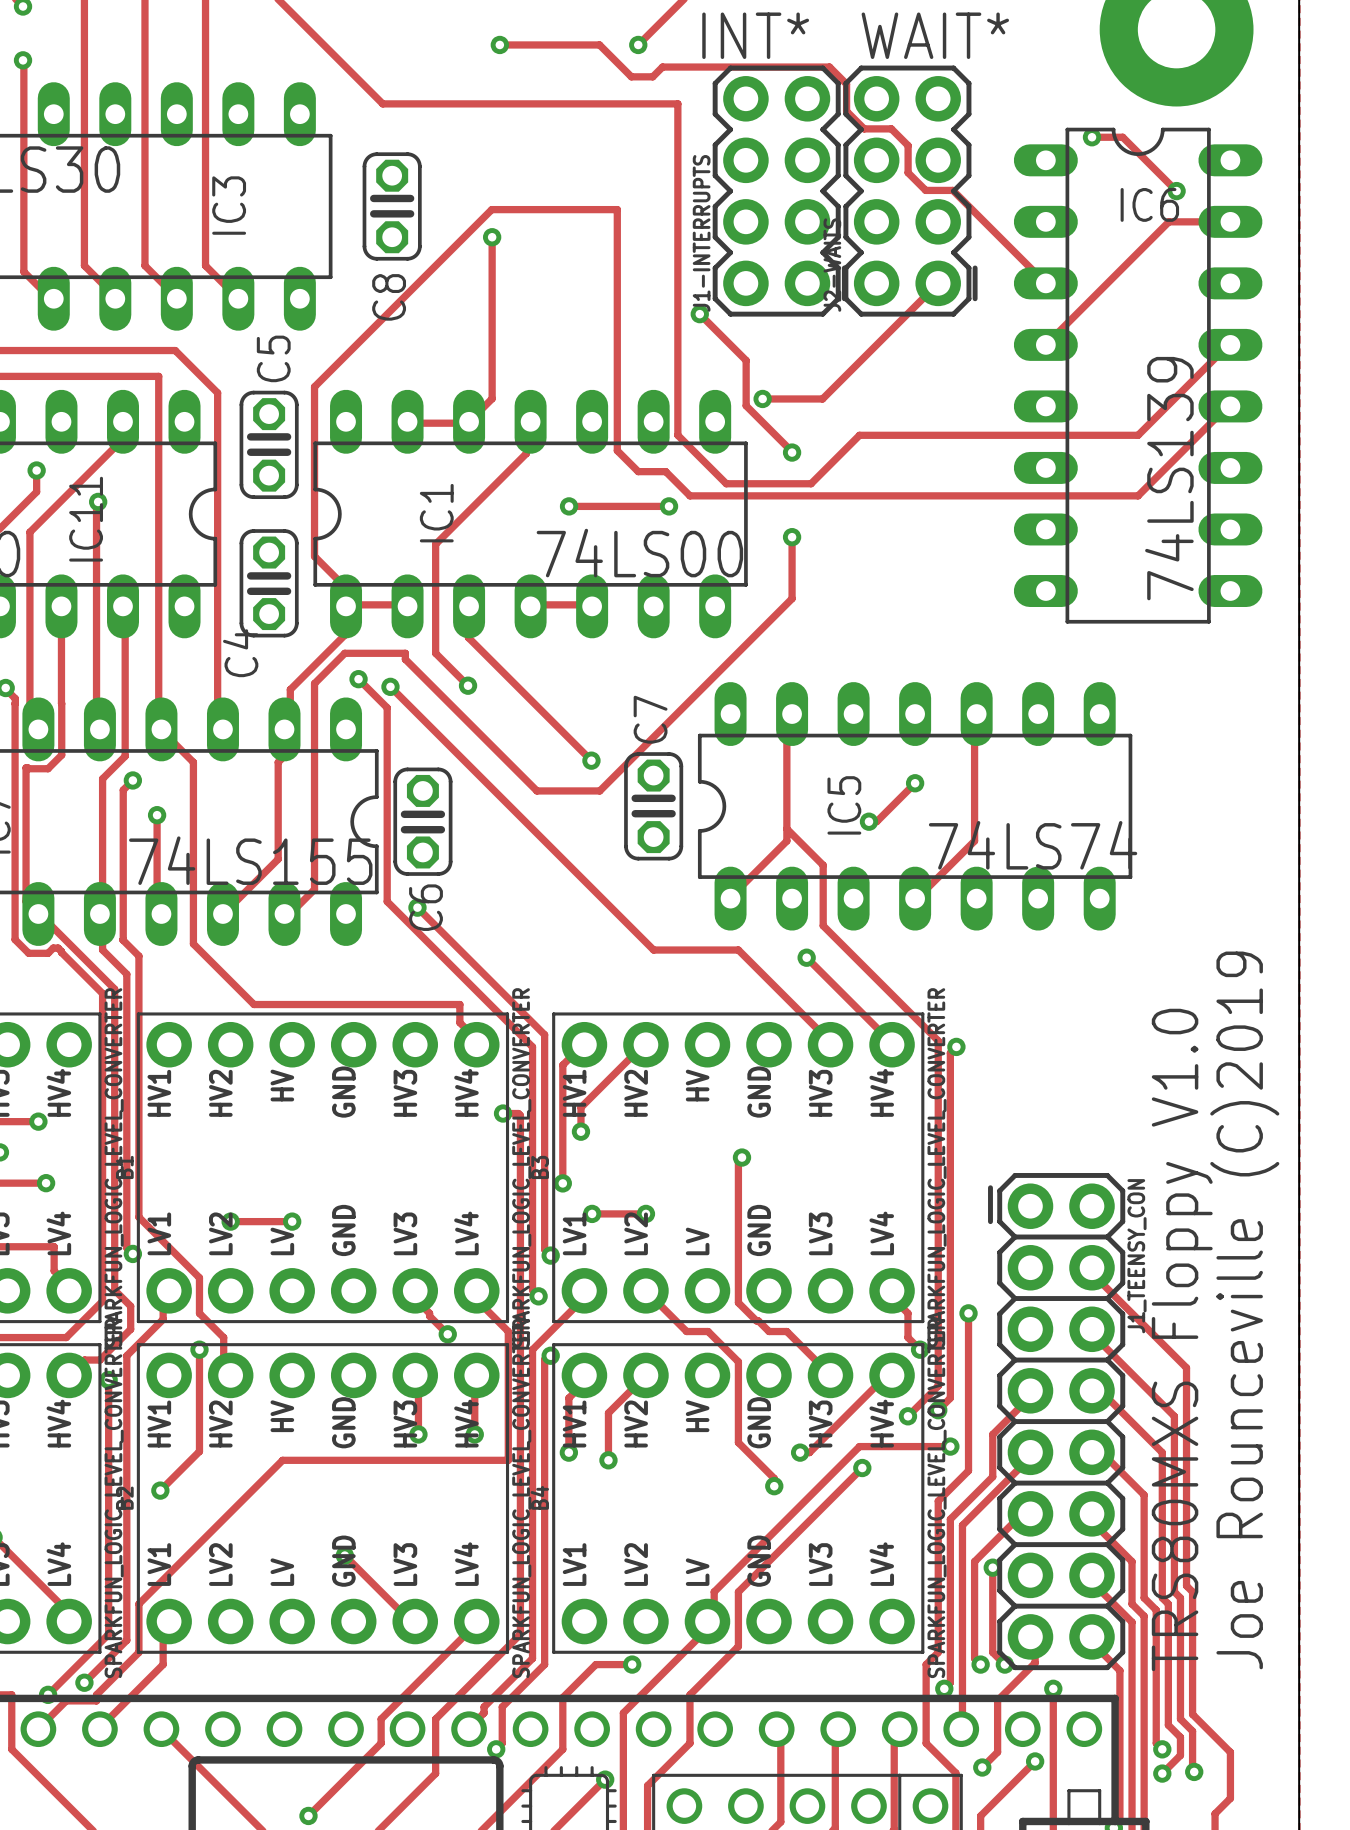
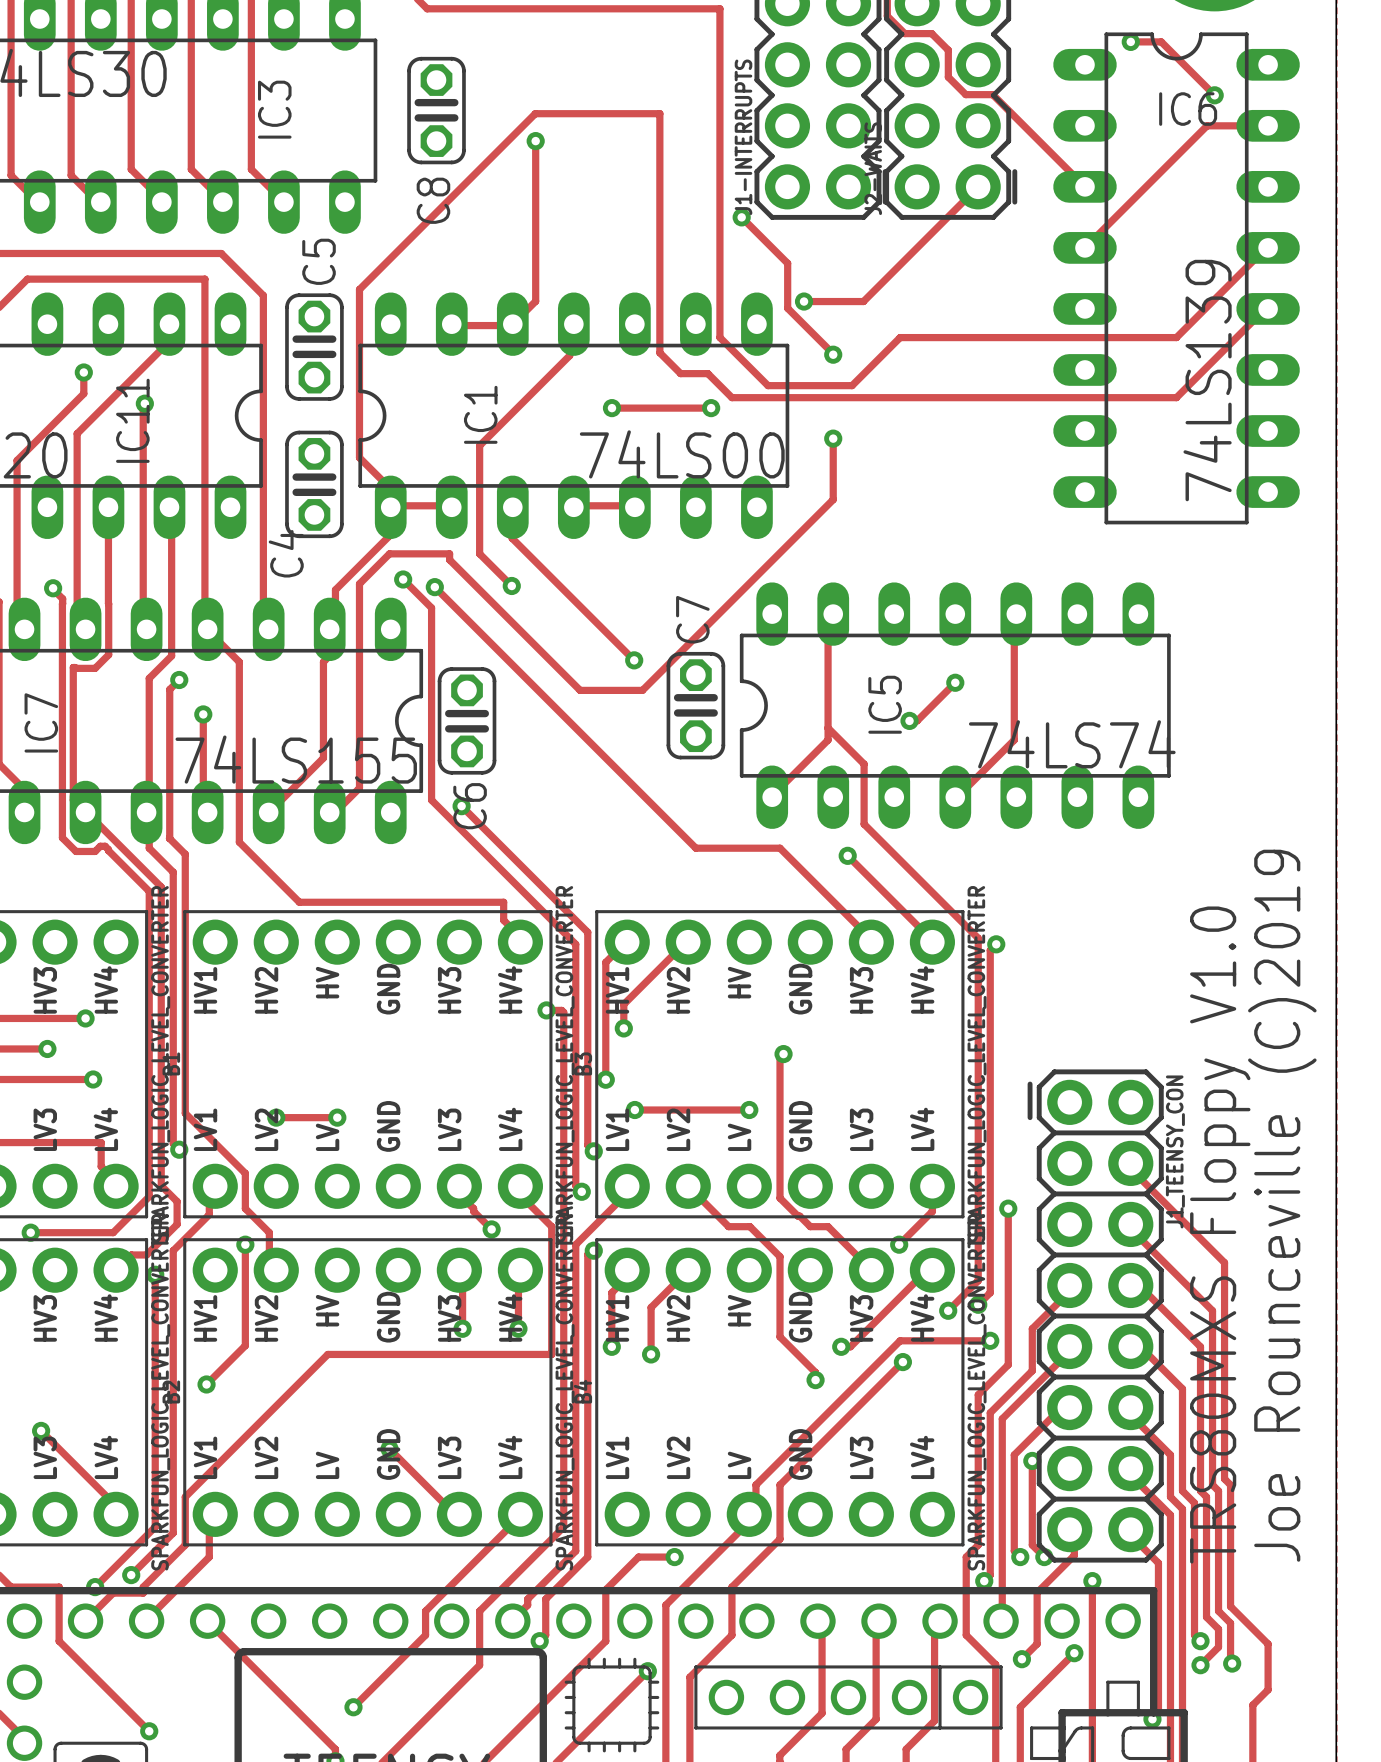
track: none -> (688, 1110) (749, 1110)
via position: (645, 1213) -> (749, 1110)
track: (892, 1290) (895, 1295) (895, 1301) (907, 1313) (907, 1337) (920, 1349) -> (932, 1186) (932, 1211) (899, 1244)
via position: (920, 1349) -> (899, 1244)

